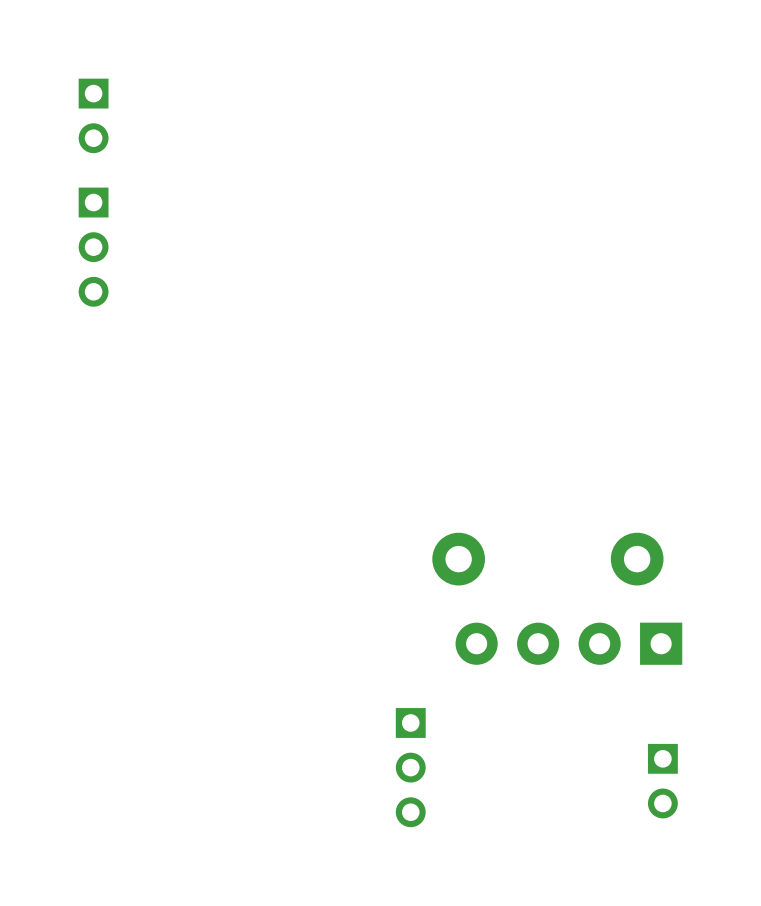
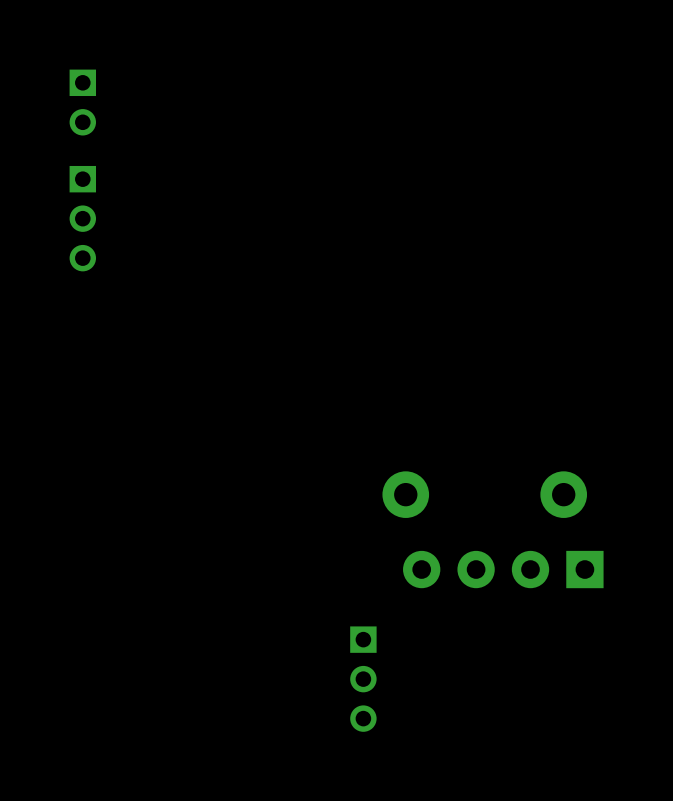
part: (662, 781) -> none

